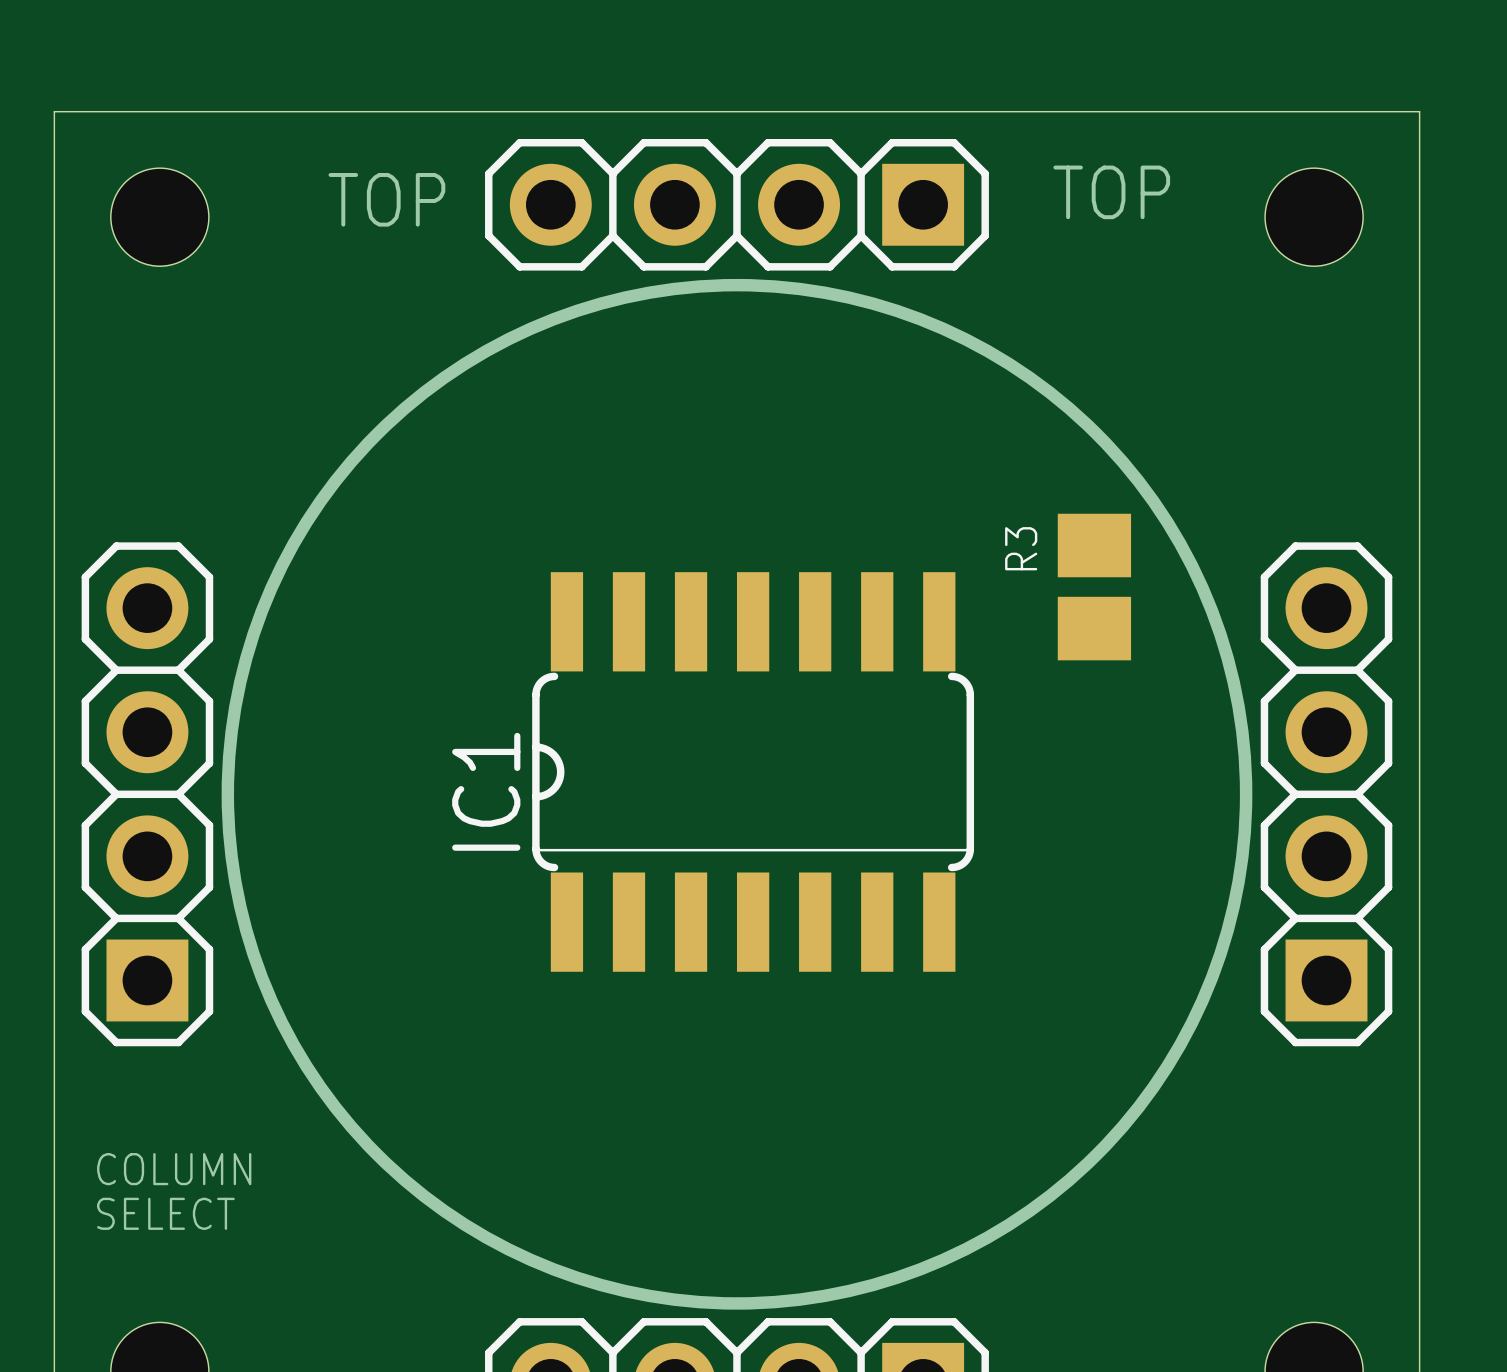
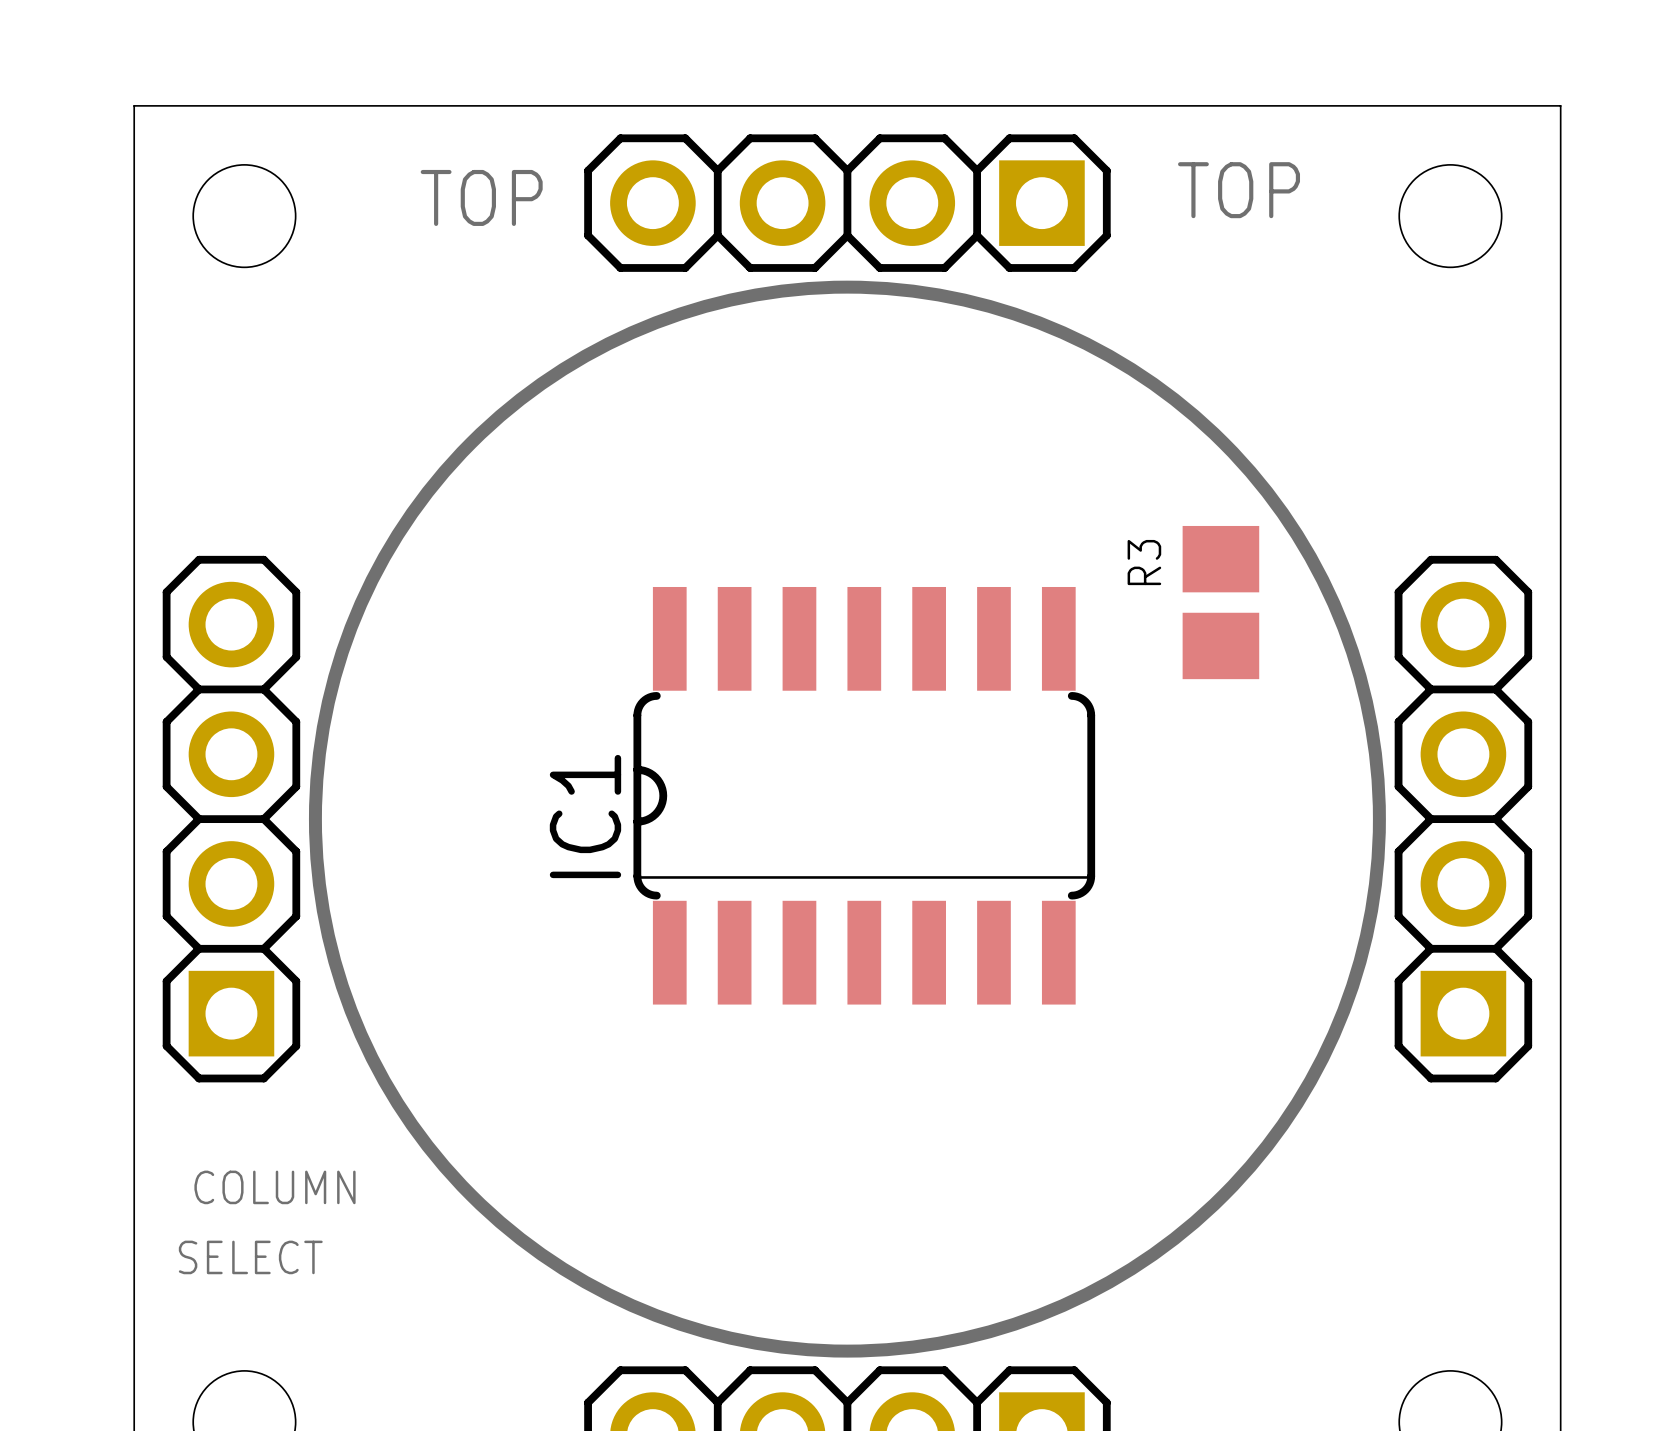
text position: COLUMN (174, 1169) -> COLUMN (275, 1187)

